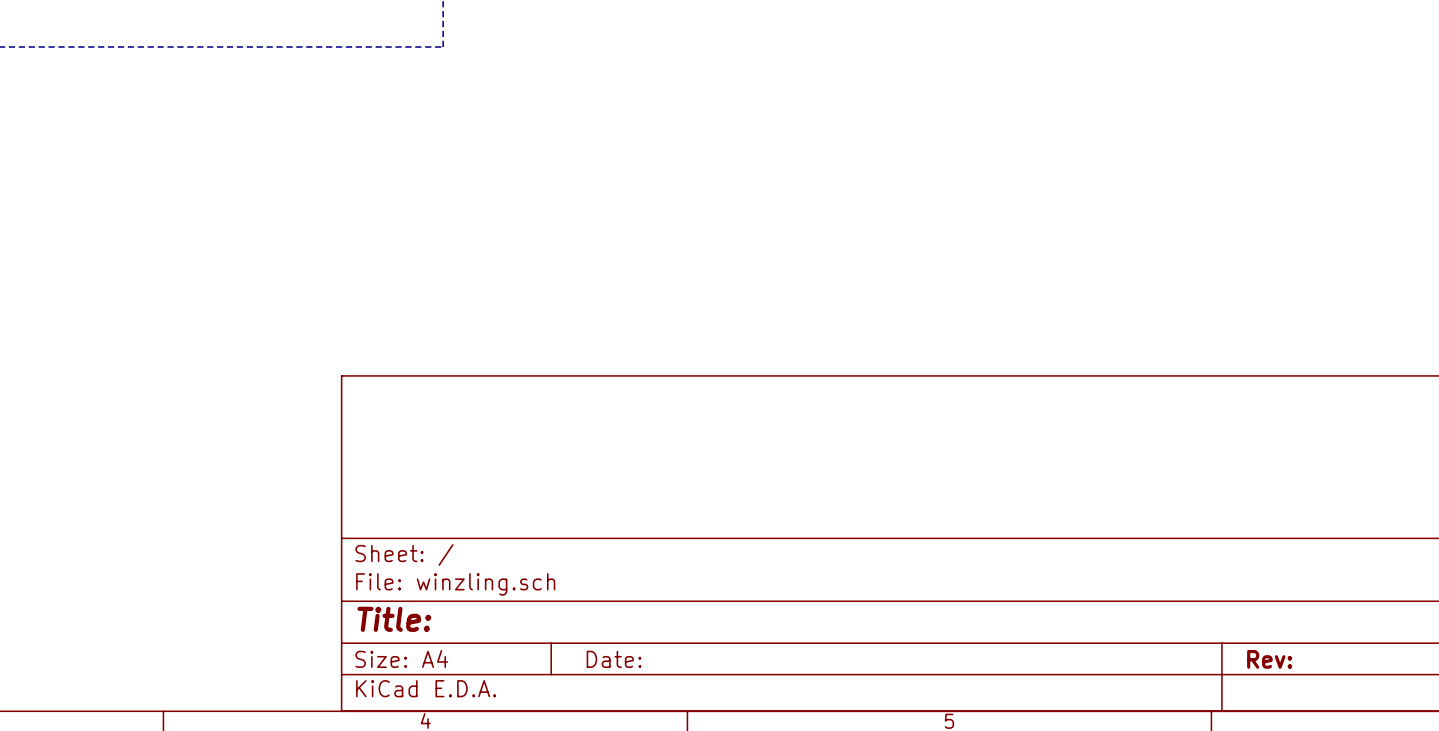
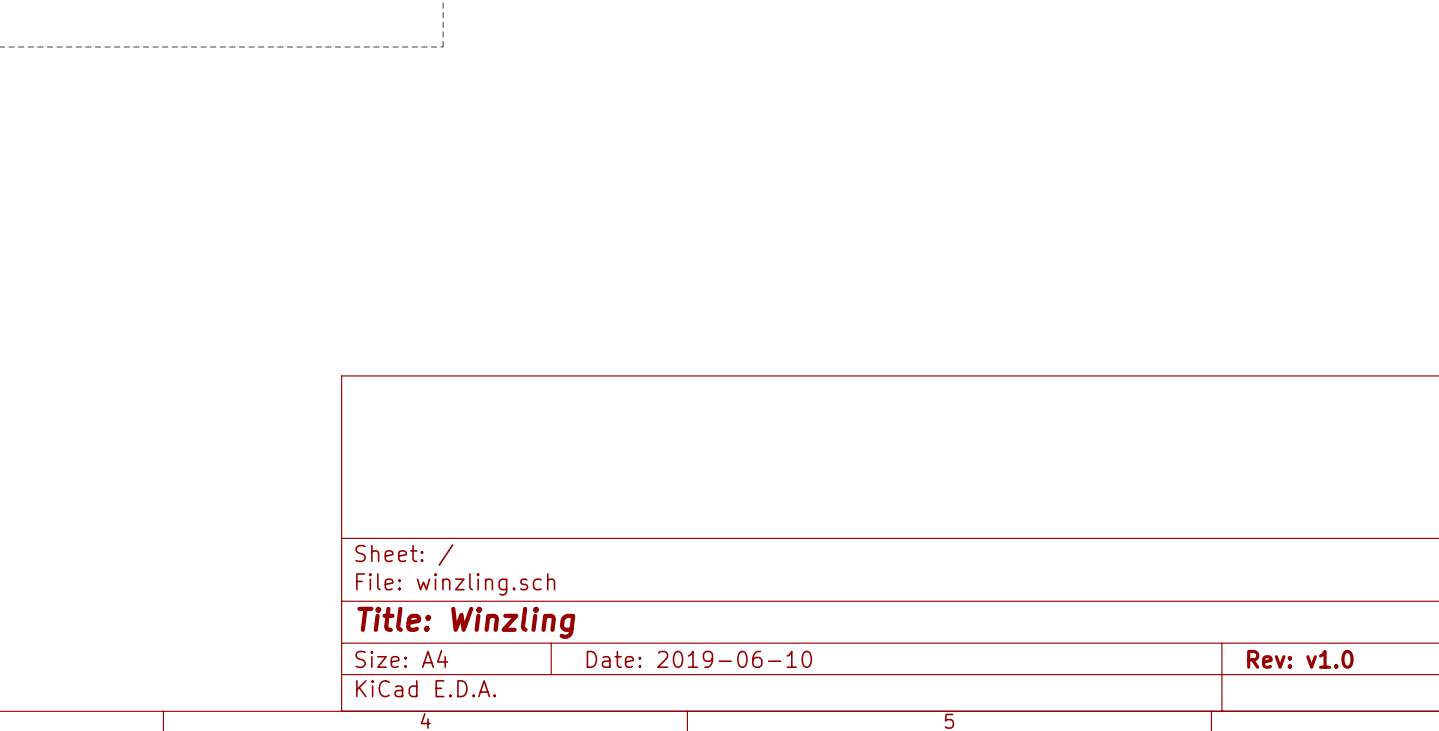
title block: Title: (394, 619) -> Title: Winzling (466, 622)
title block: Date: (614, 659) -> Date: 2019-06-10 (699, 659)
title block: Rev: (1269, 659) -> Rev: v1.0 (1300, 659)

